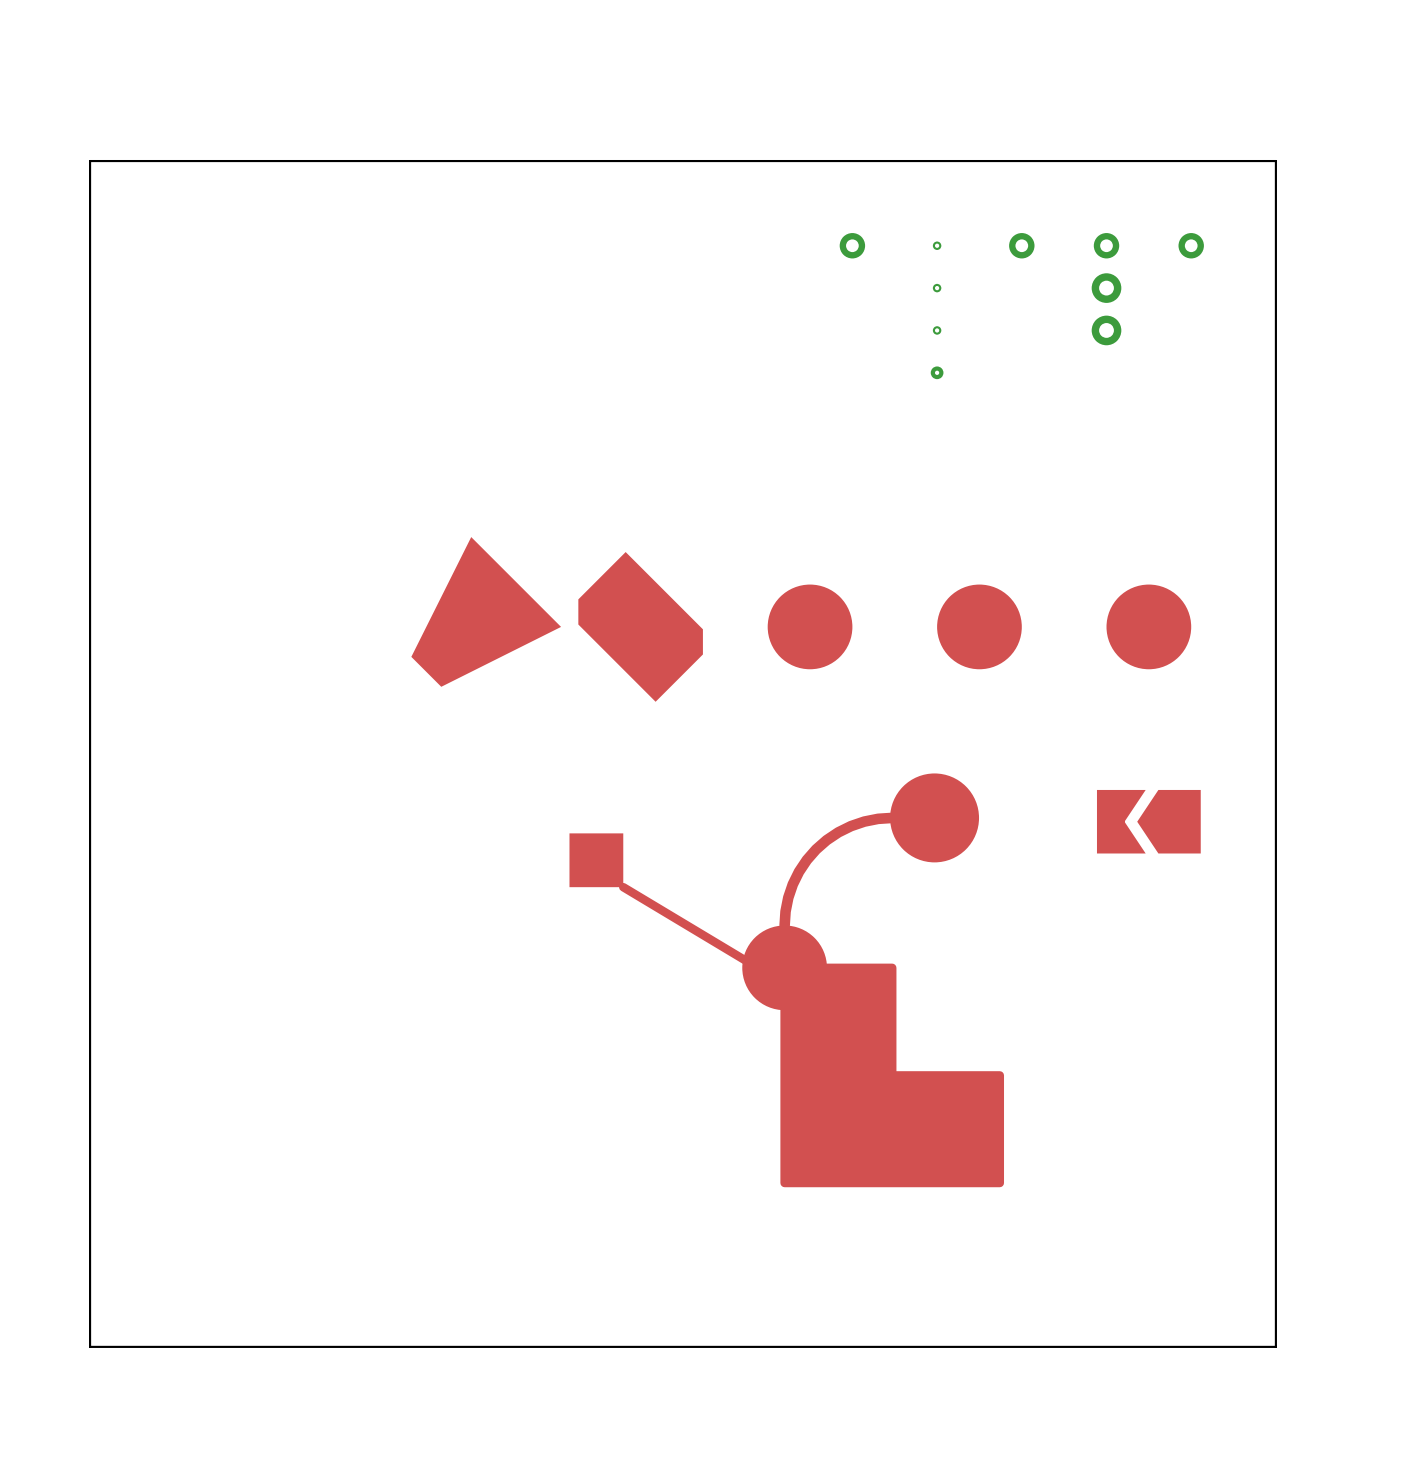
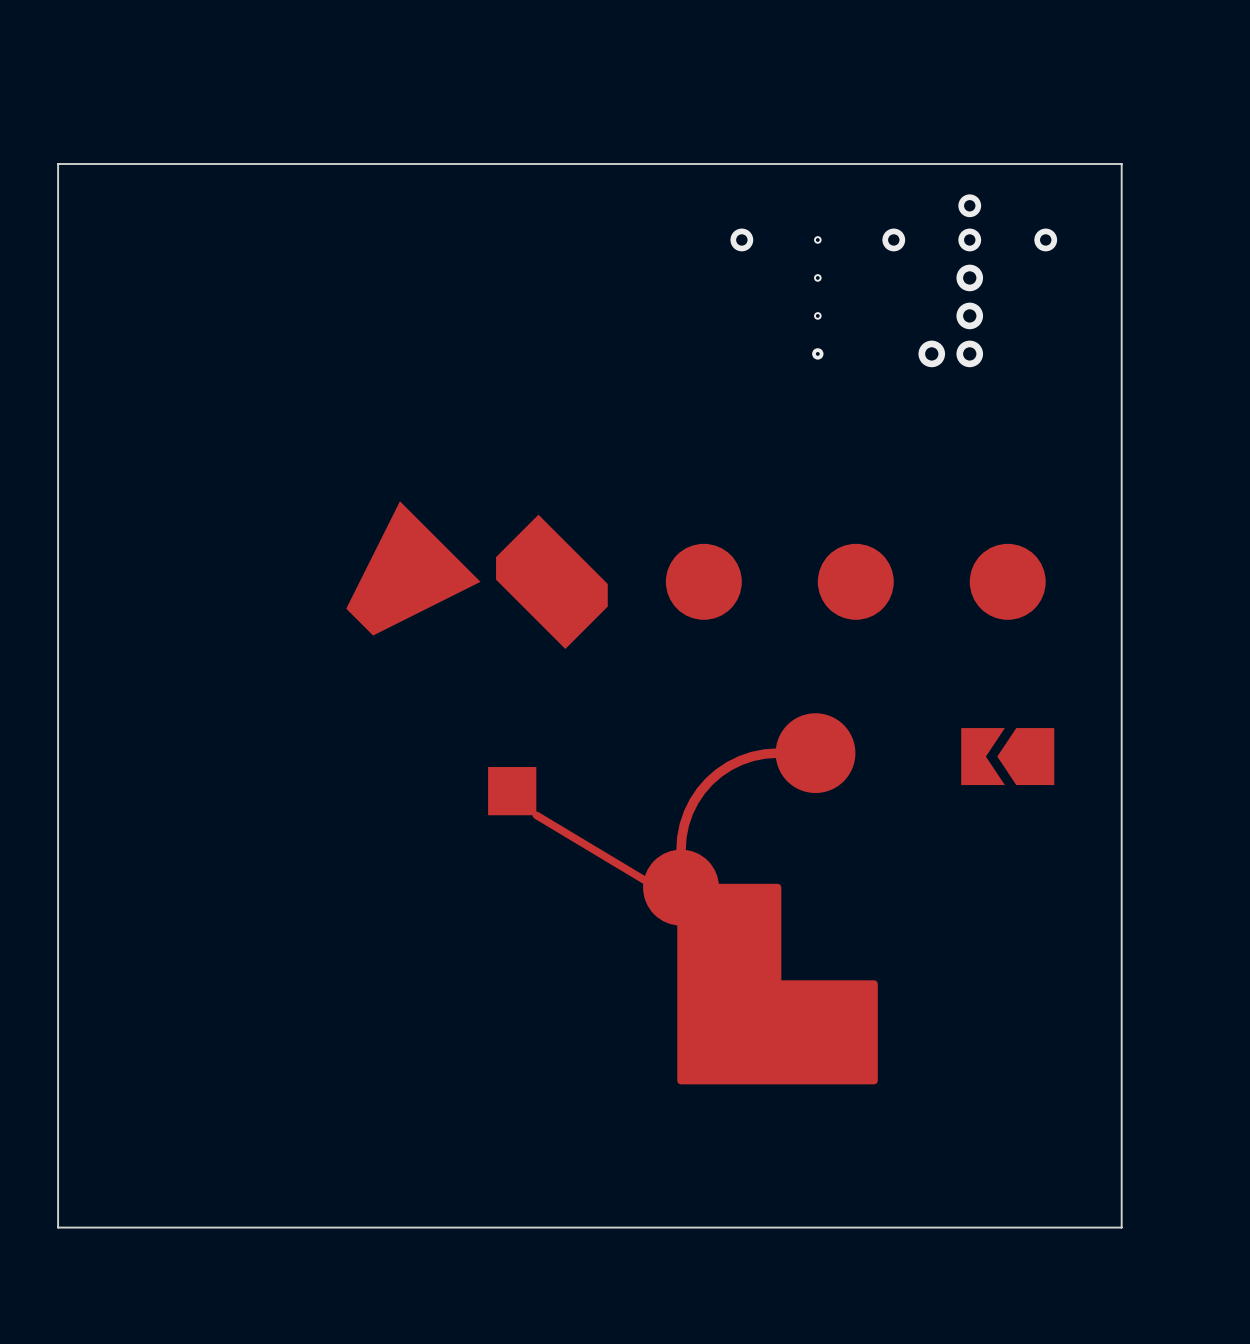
via: none -> (969, 205)
via: none -> (931, 353)
via: none -> (969, 353)

